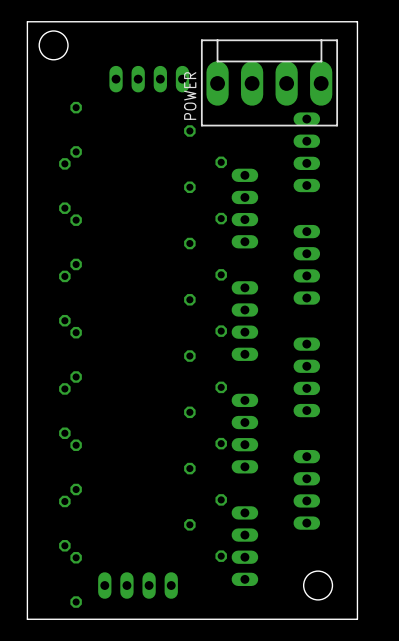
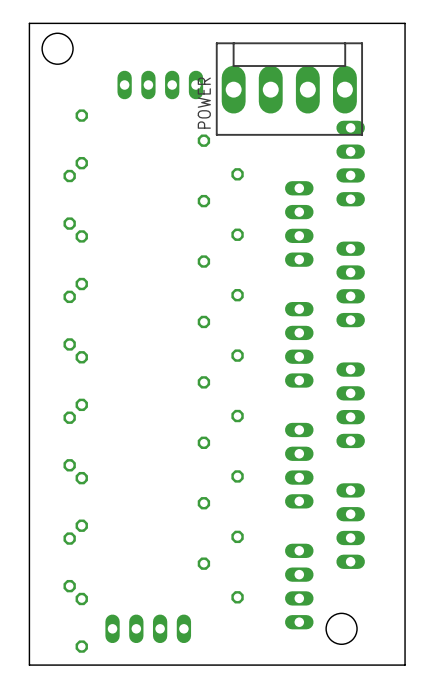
board edge: (357, 21) (357, 619) -> (383, 23) (405, 23) (405, 665) (383, 665)
part position: (306, 152) -> (350, 163)
part: (244, 208) -> none
part: none -> (299, 223)
part position: (306, 264) -> (350, 284)
part: (244, 321) -> none
part: none -> (299, 344)
part position: (306, 377) -> (350, 405)
part: (244, 433) -> none
part: none -> (299, 465)
part position: (306, 489) -> (350, 526)
part: (244, 546) -> none
part: none -> (299, 586)

